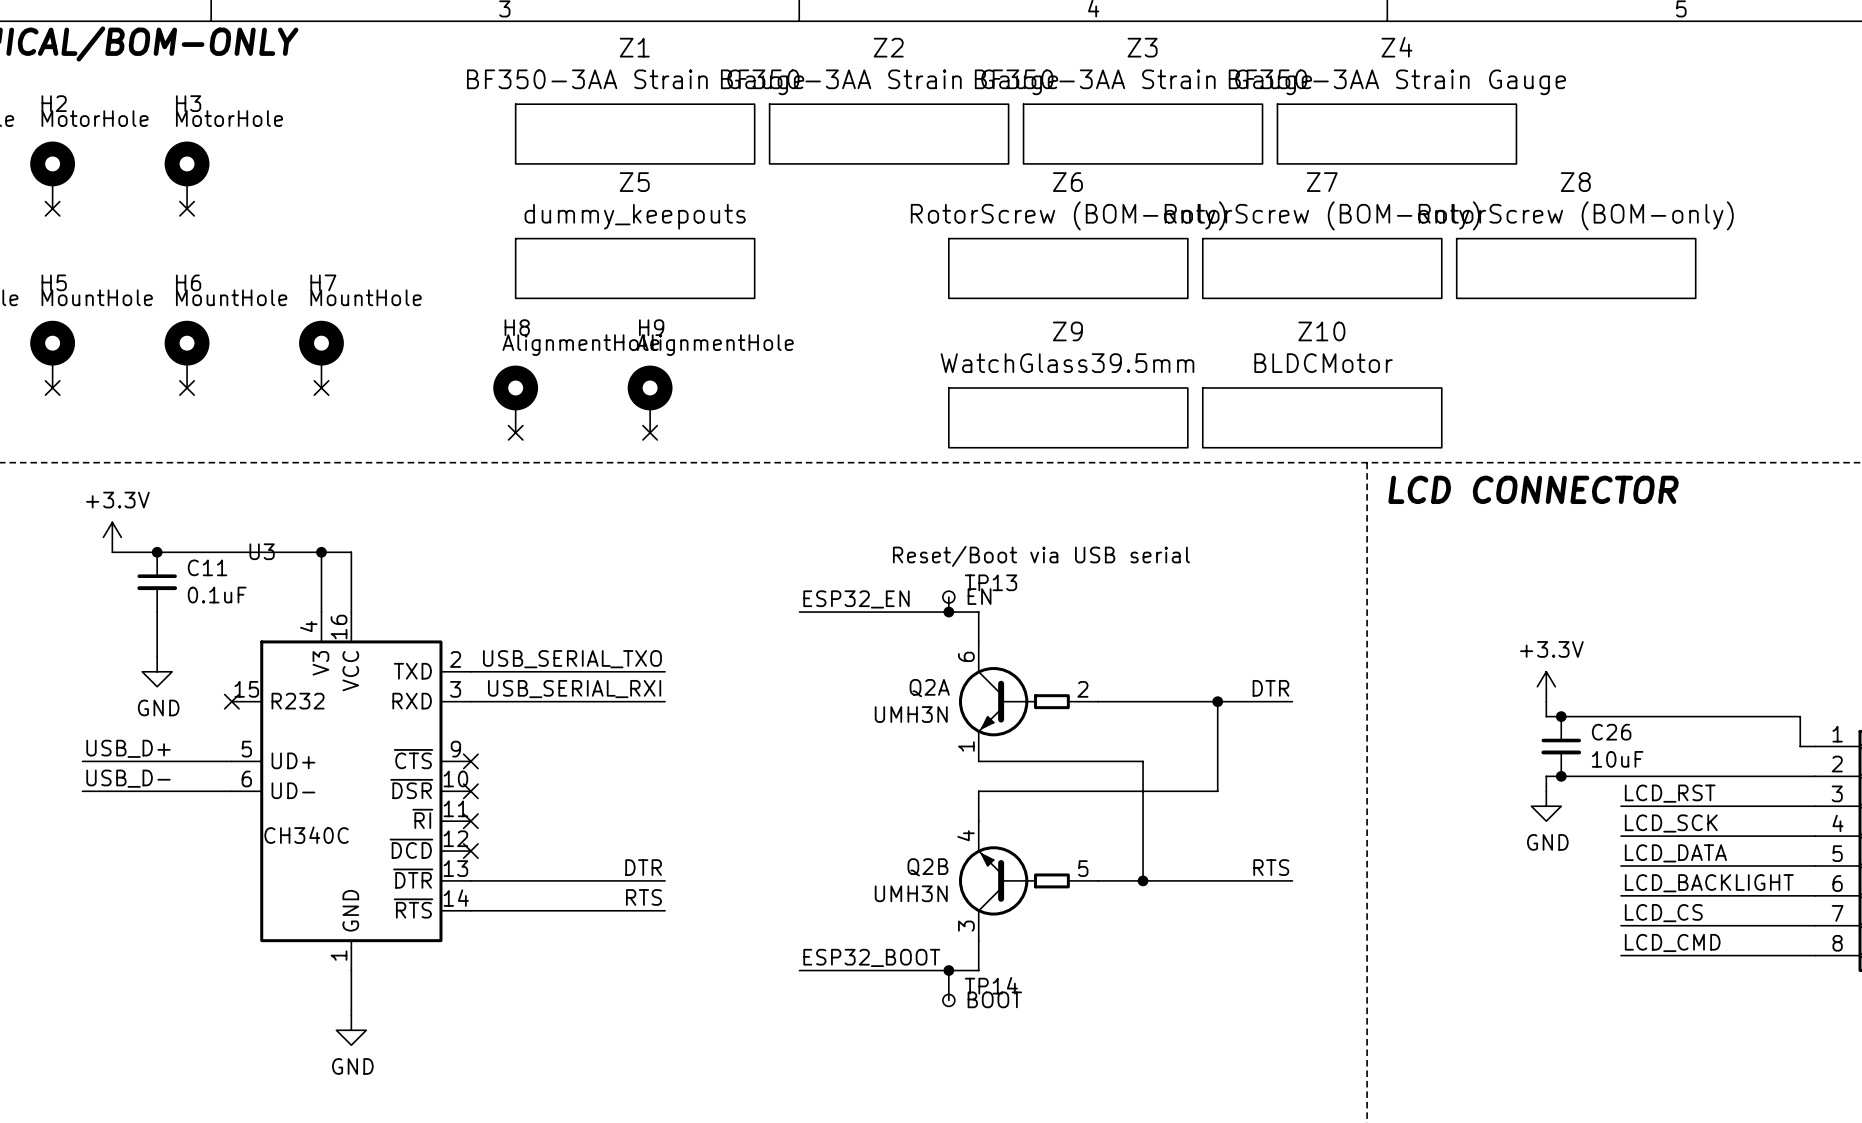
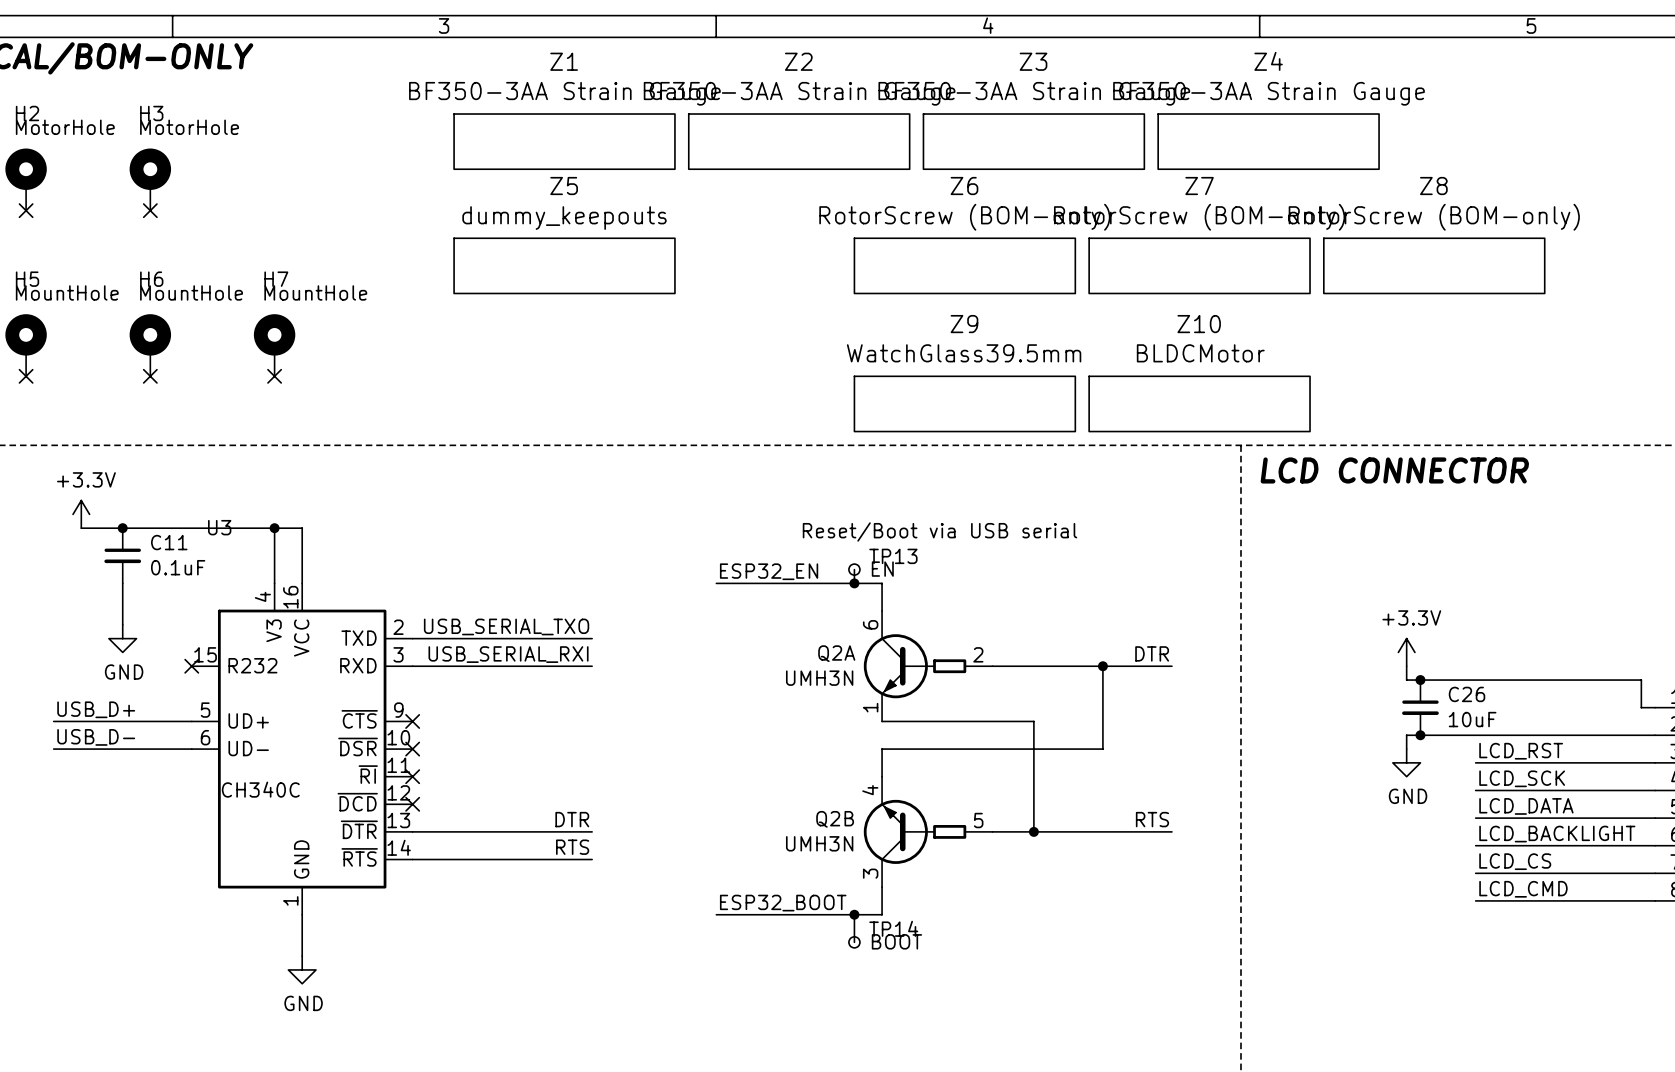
H8: AlignmentHole (515, 399) -> none
H9: AlignmentHole (650, 399) -> none
no-connect mark: (515, 432) -> none
no-connect mark: (650, 432) -> none

